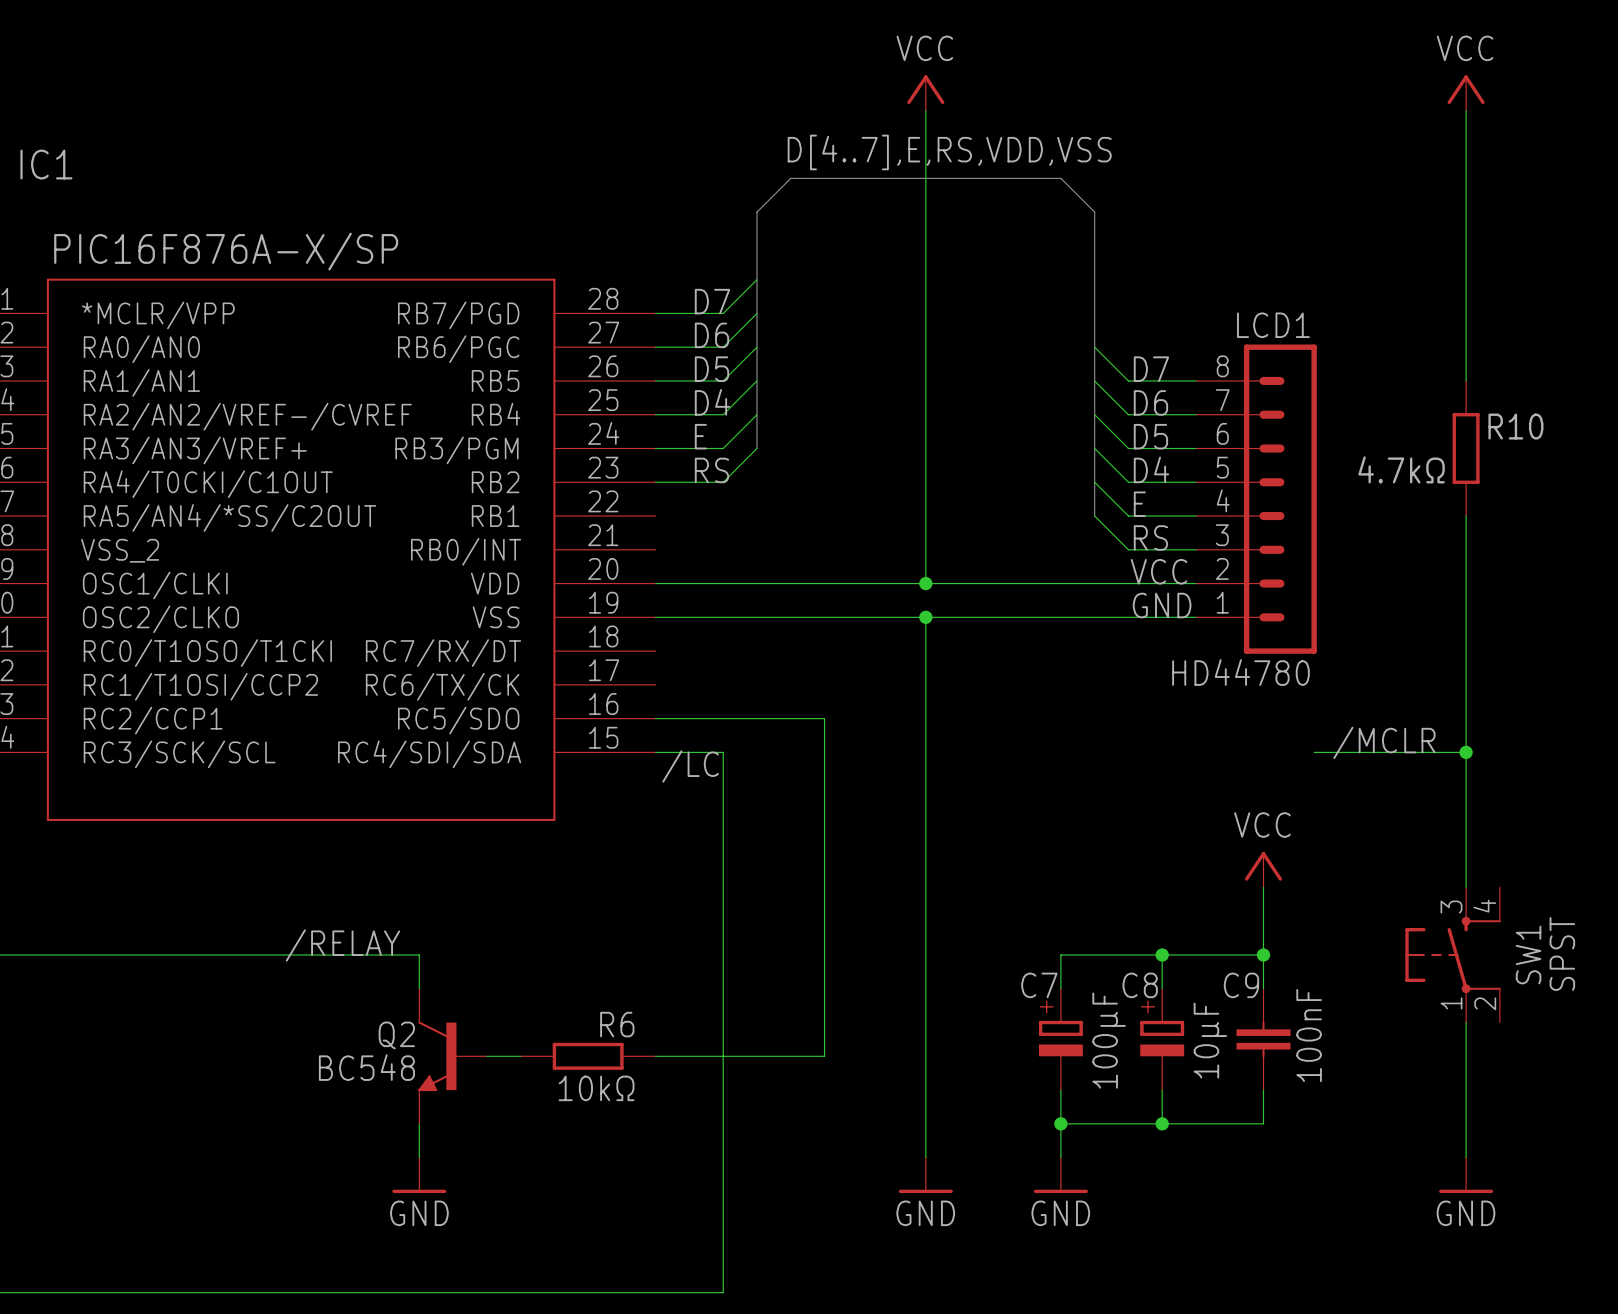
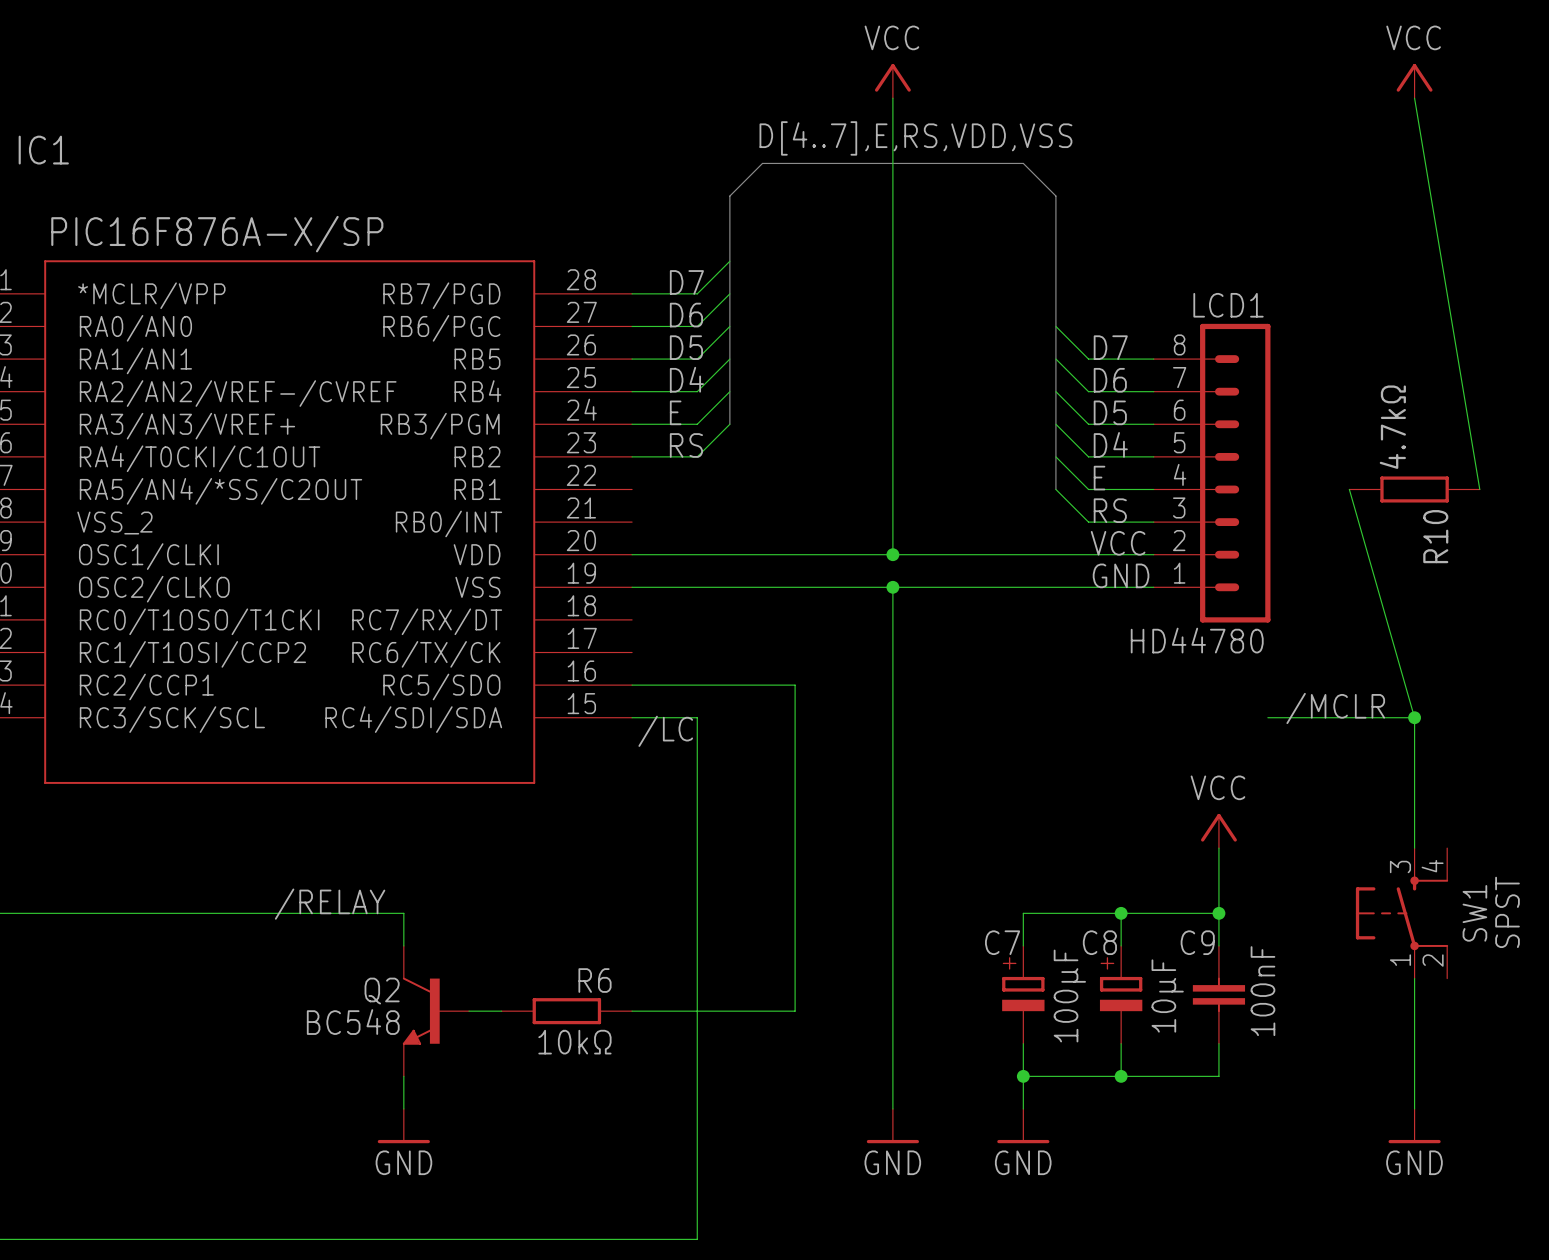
wire: (1466, 110) (1466, 380) -> (1414, 98) (1479, 489)
R10 rotation: 0° (1466, 448) -> 90° clockwise (1414, 489)
wire: (1466, 516) (1466, 752) -> (1349, 489) (1414, 717)

